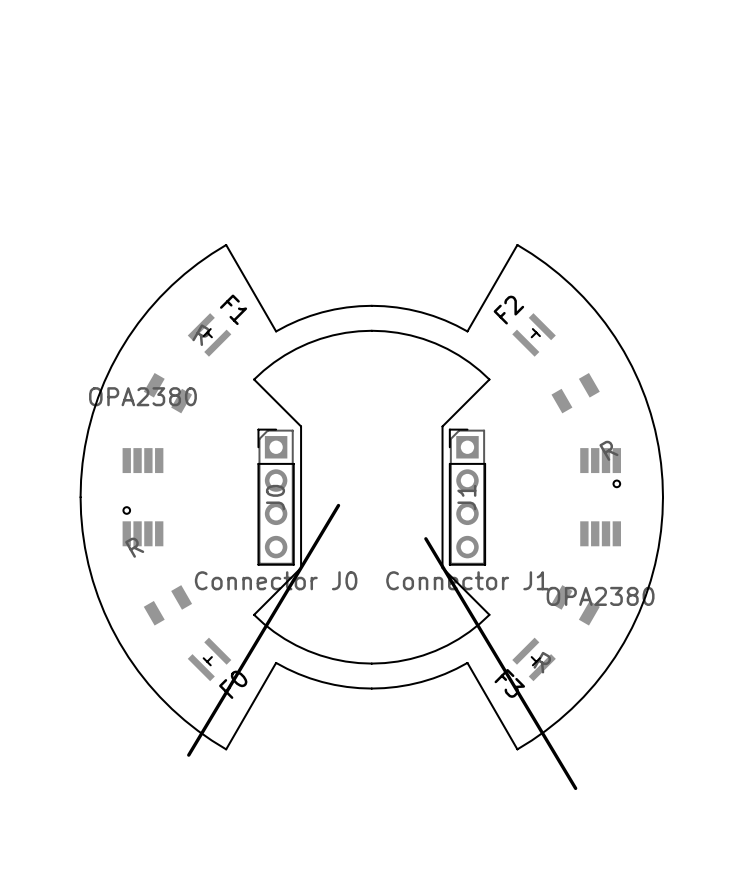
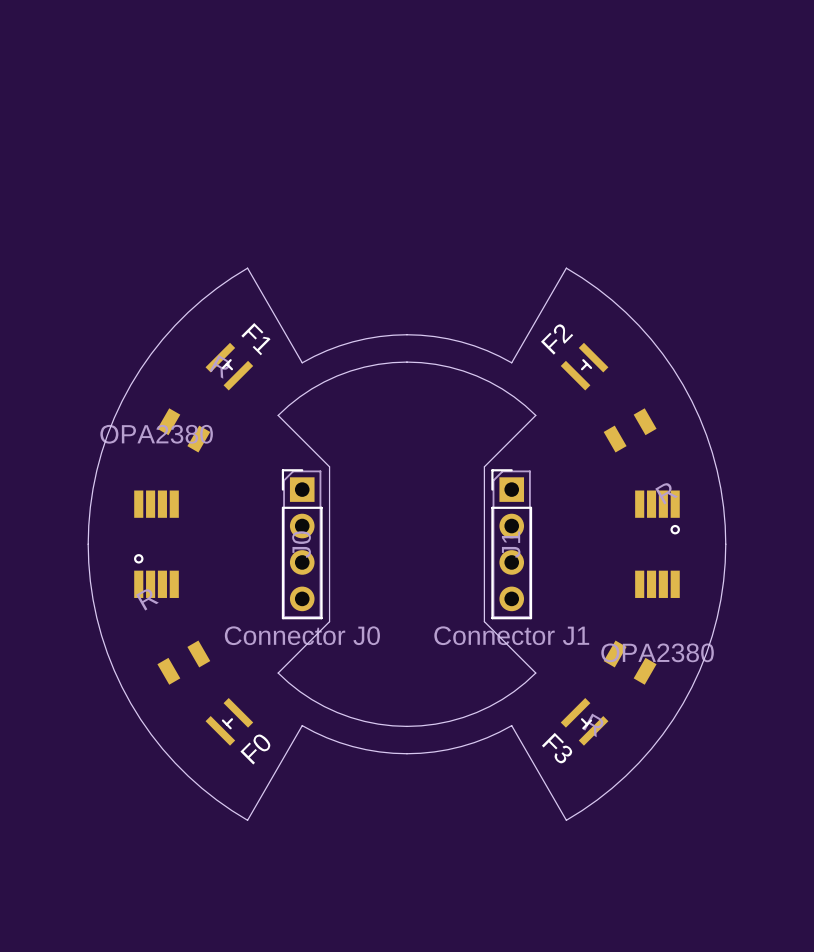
line: (338, 505) (188, 755) -> none
line: (425, 538) (575, 788) -> none

